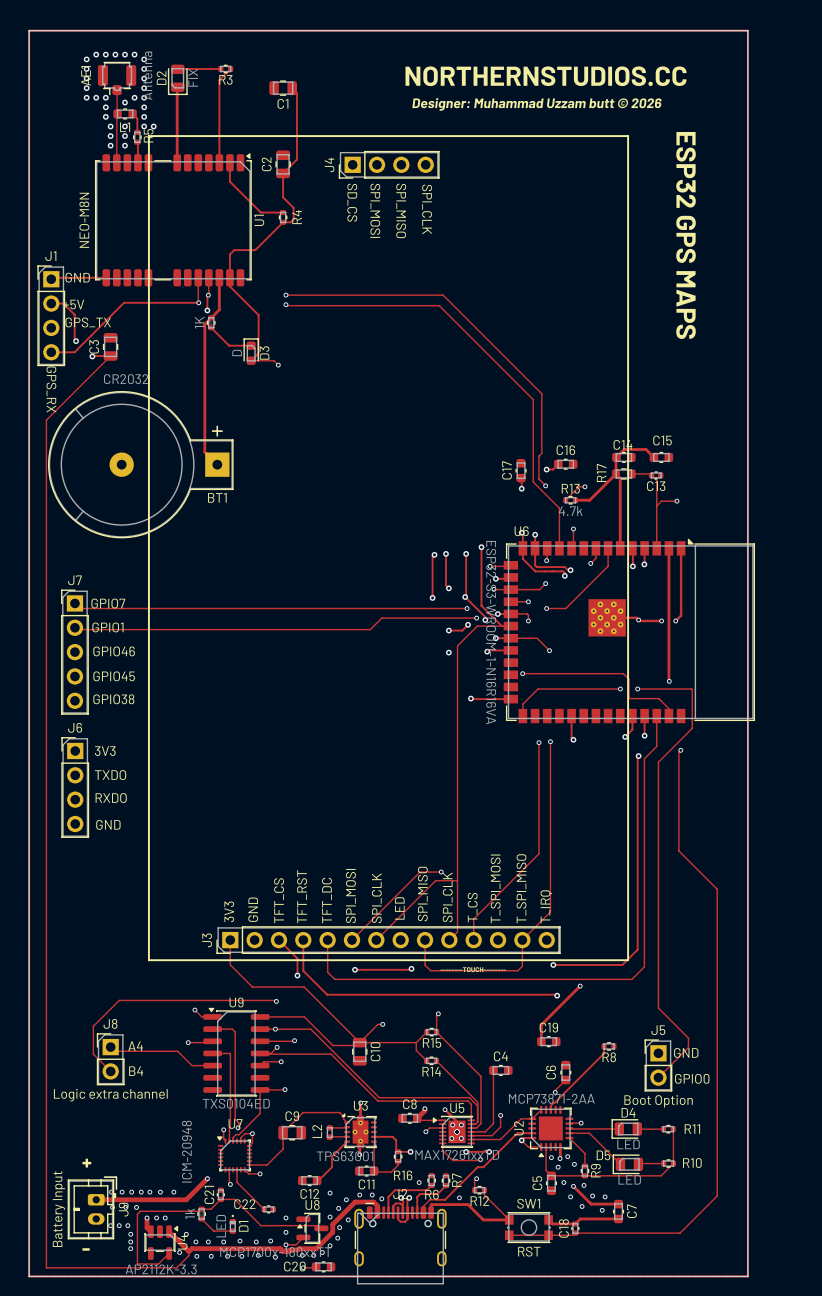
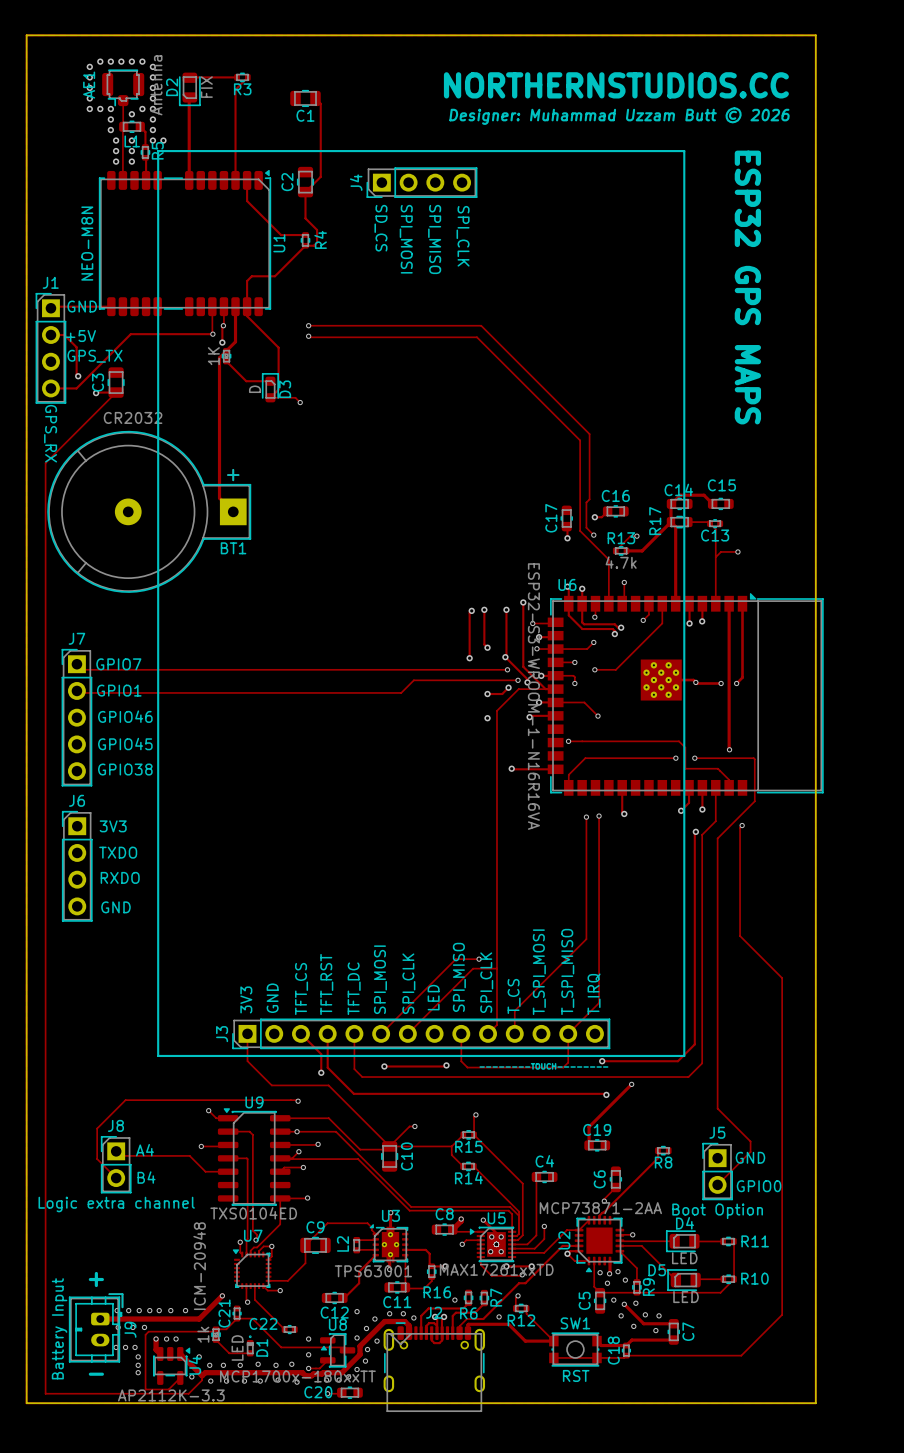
text: Designer: Muhammad Uzzam butt ©️ 2026 (536, 104) -> Designer: Muhammad Uzzam Butt ©️ 2026 (619, 116)

